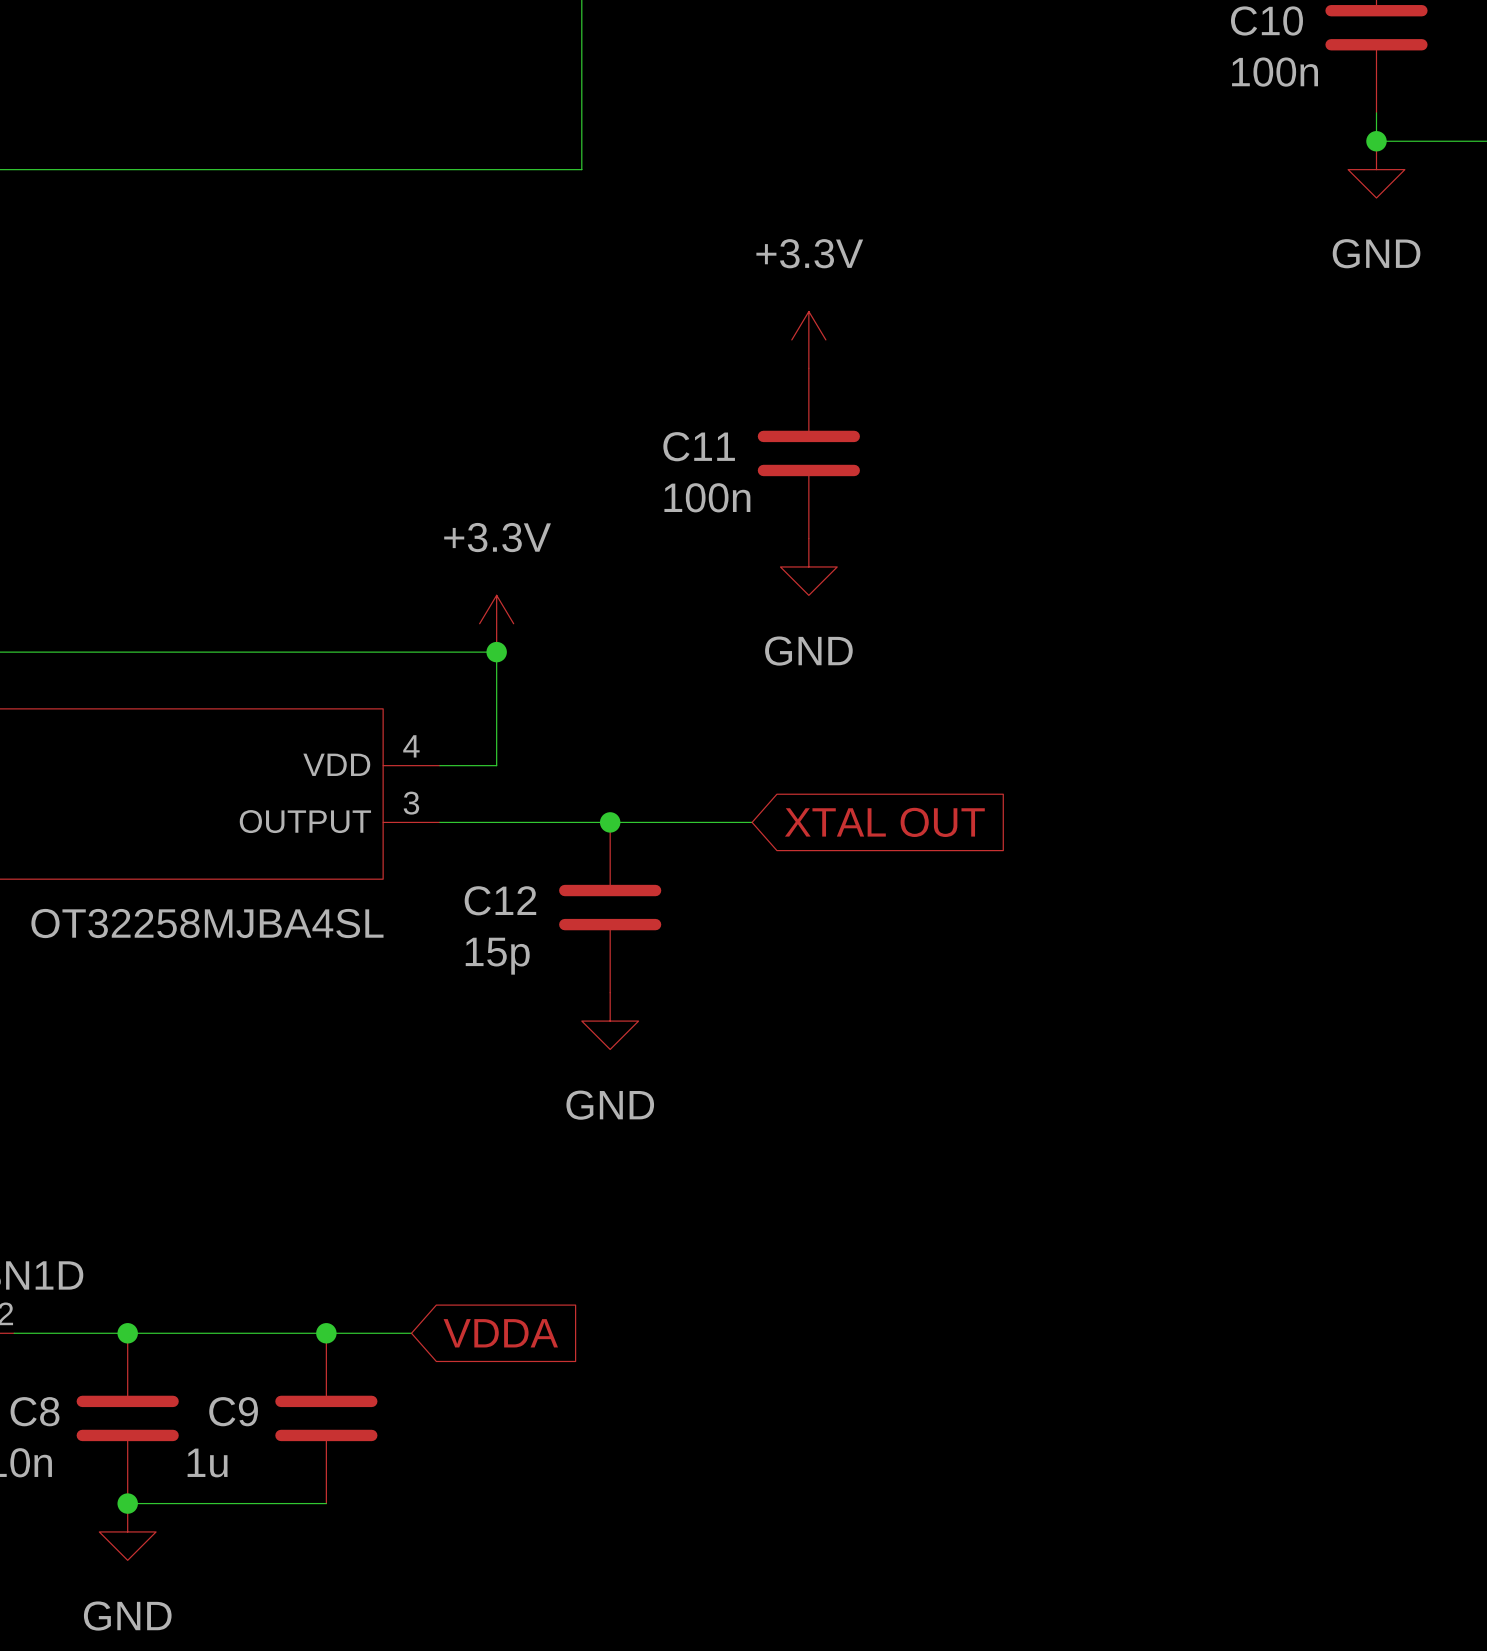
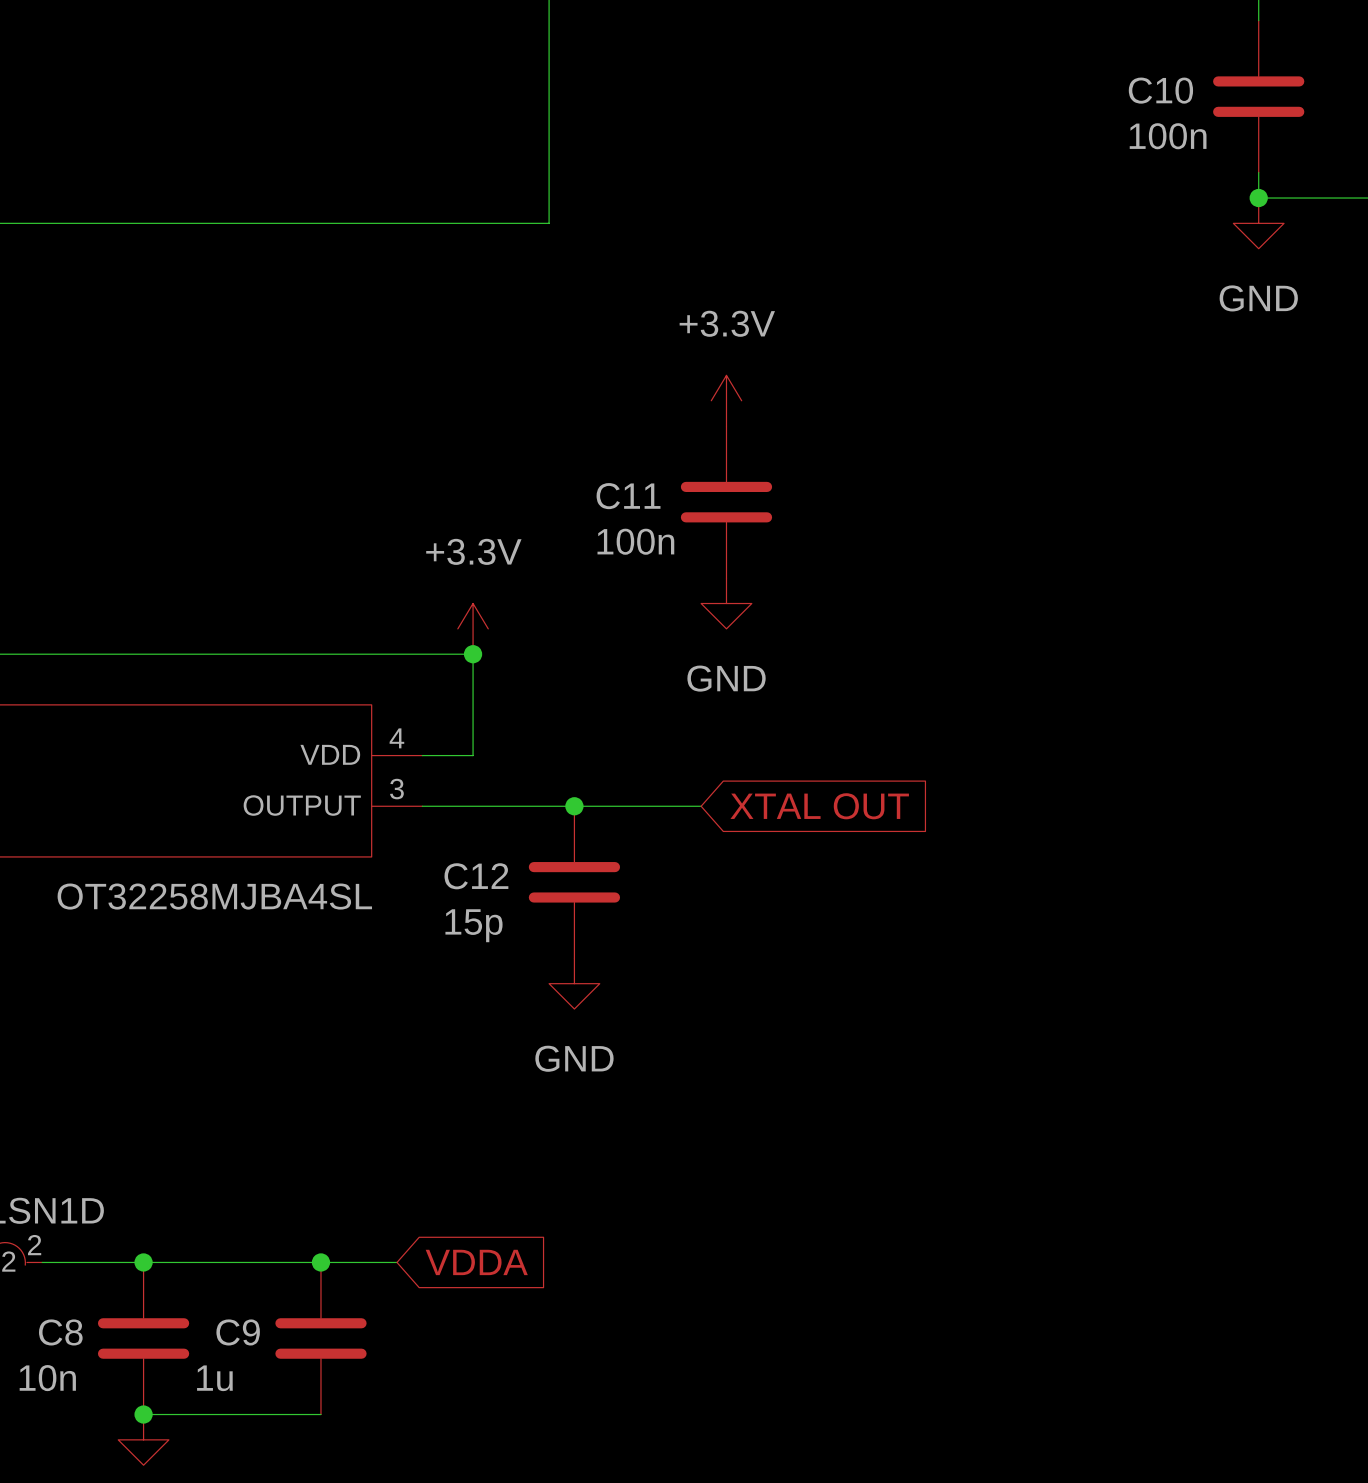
power symbol position: +3.3V (808, 339) -> +3.3V (726, 400)
C11 position: (808, 453) -> (726, 502)
power symbol position: GND (808, 566) -> GND (726, 603)

